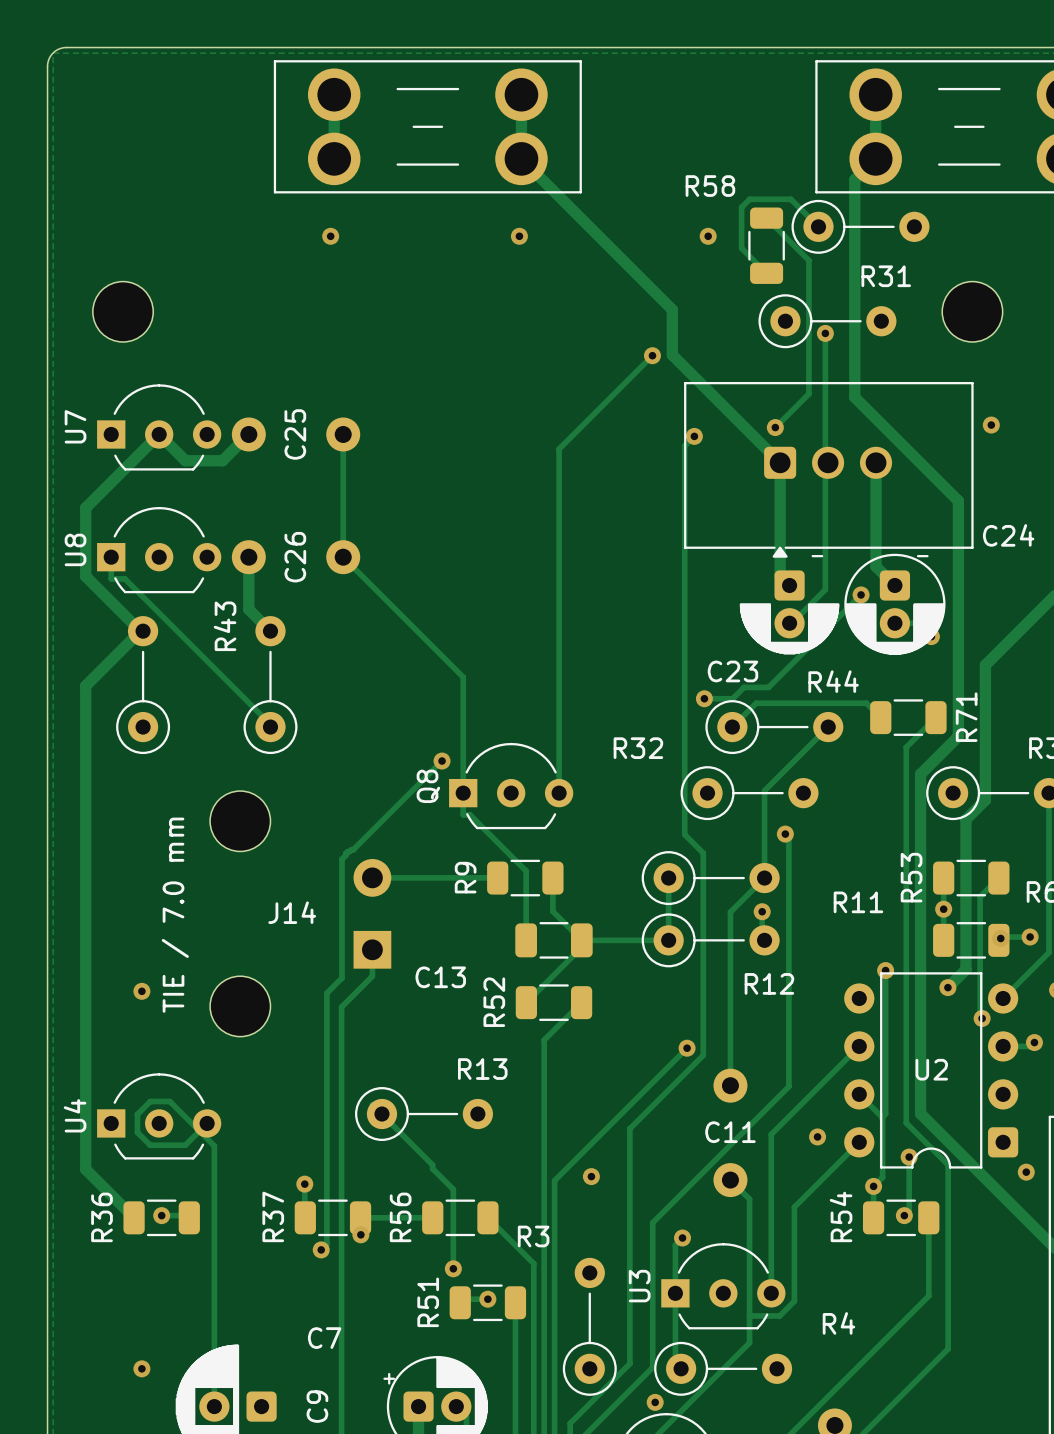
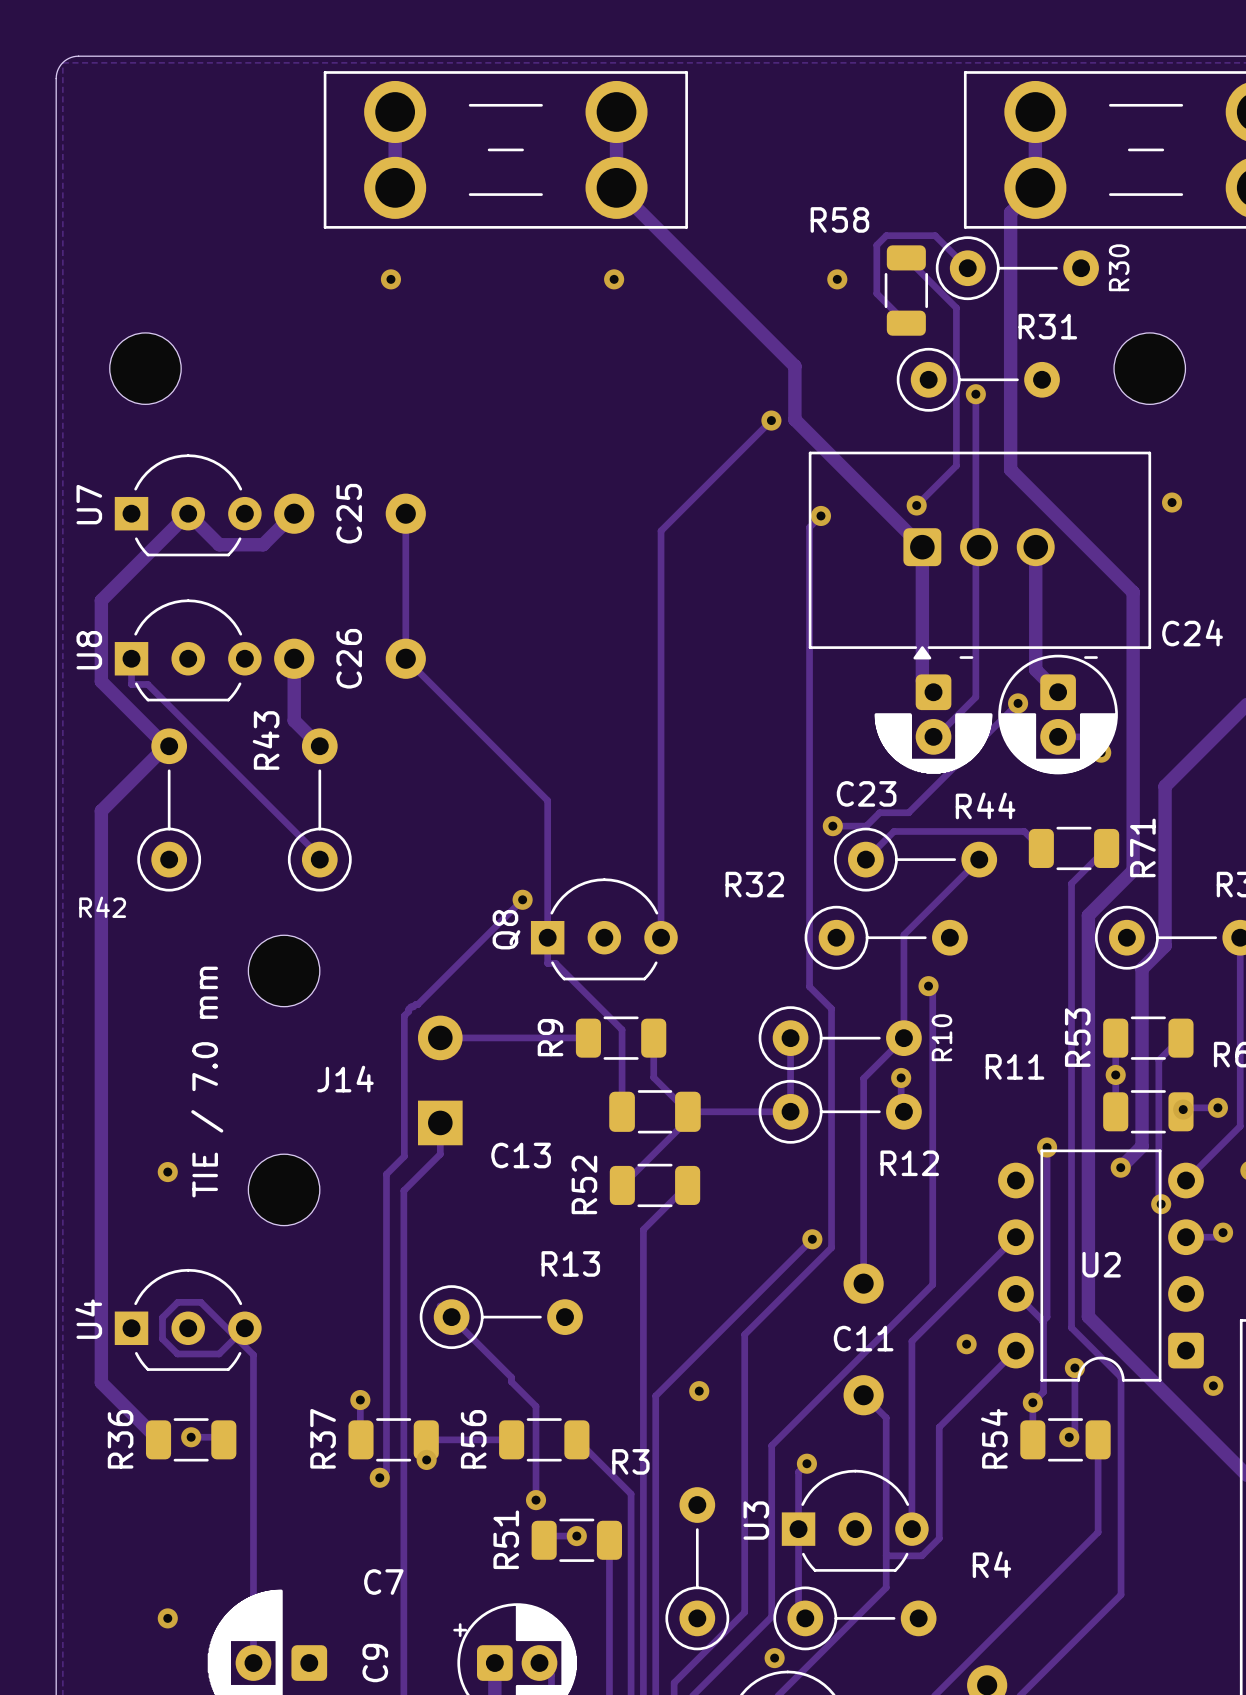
R30 name: none -> R30 (1119, 267)
R42 name: none -> R42 (102, 907)
R10 name: none -> R10 (941, 1037)

